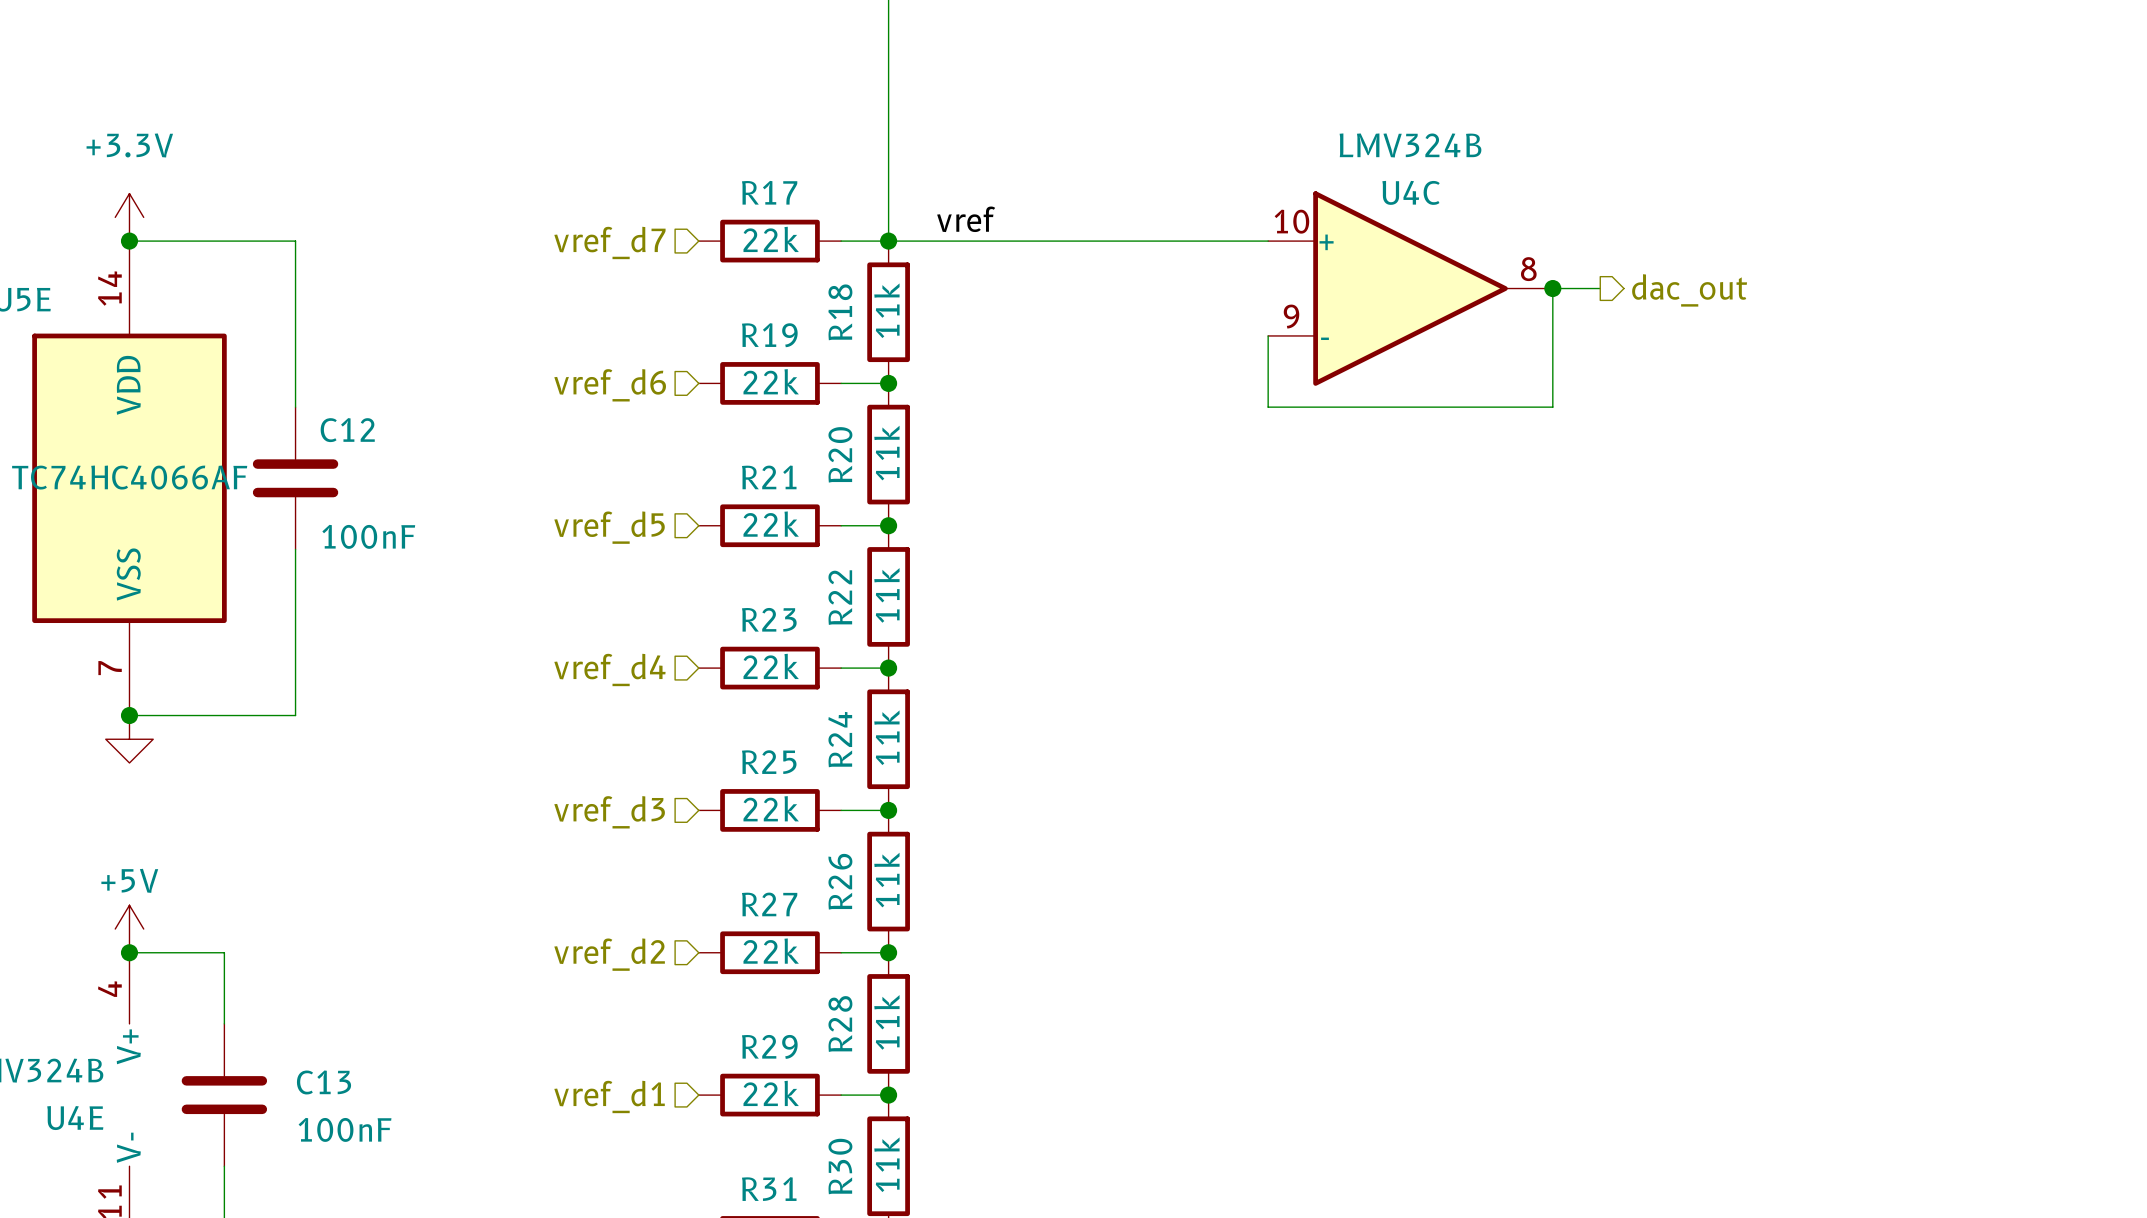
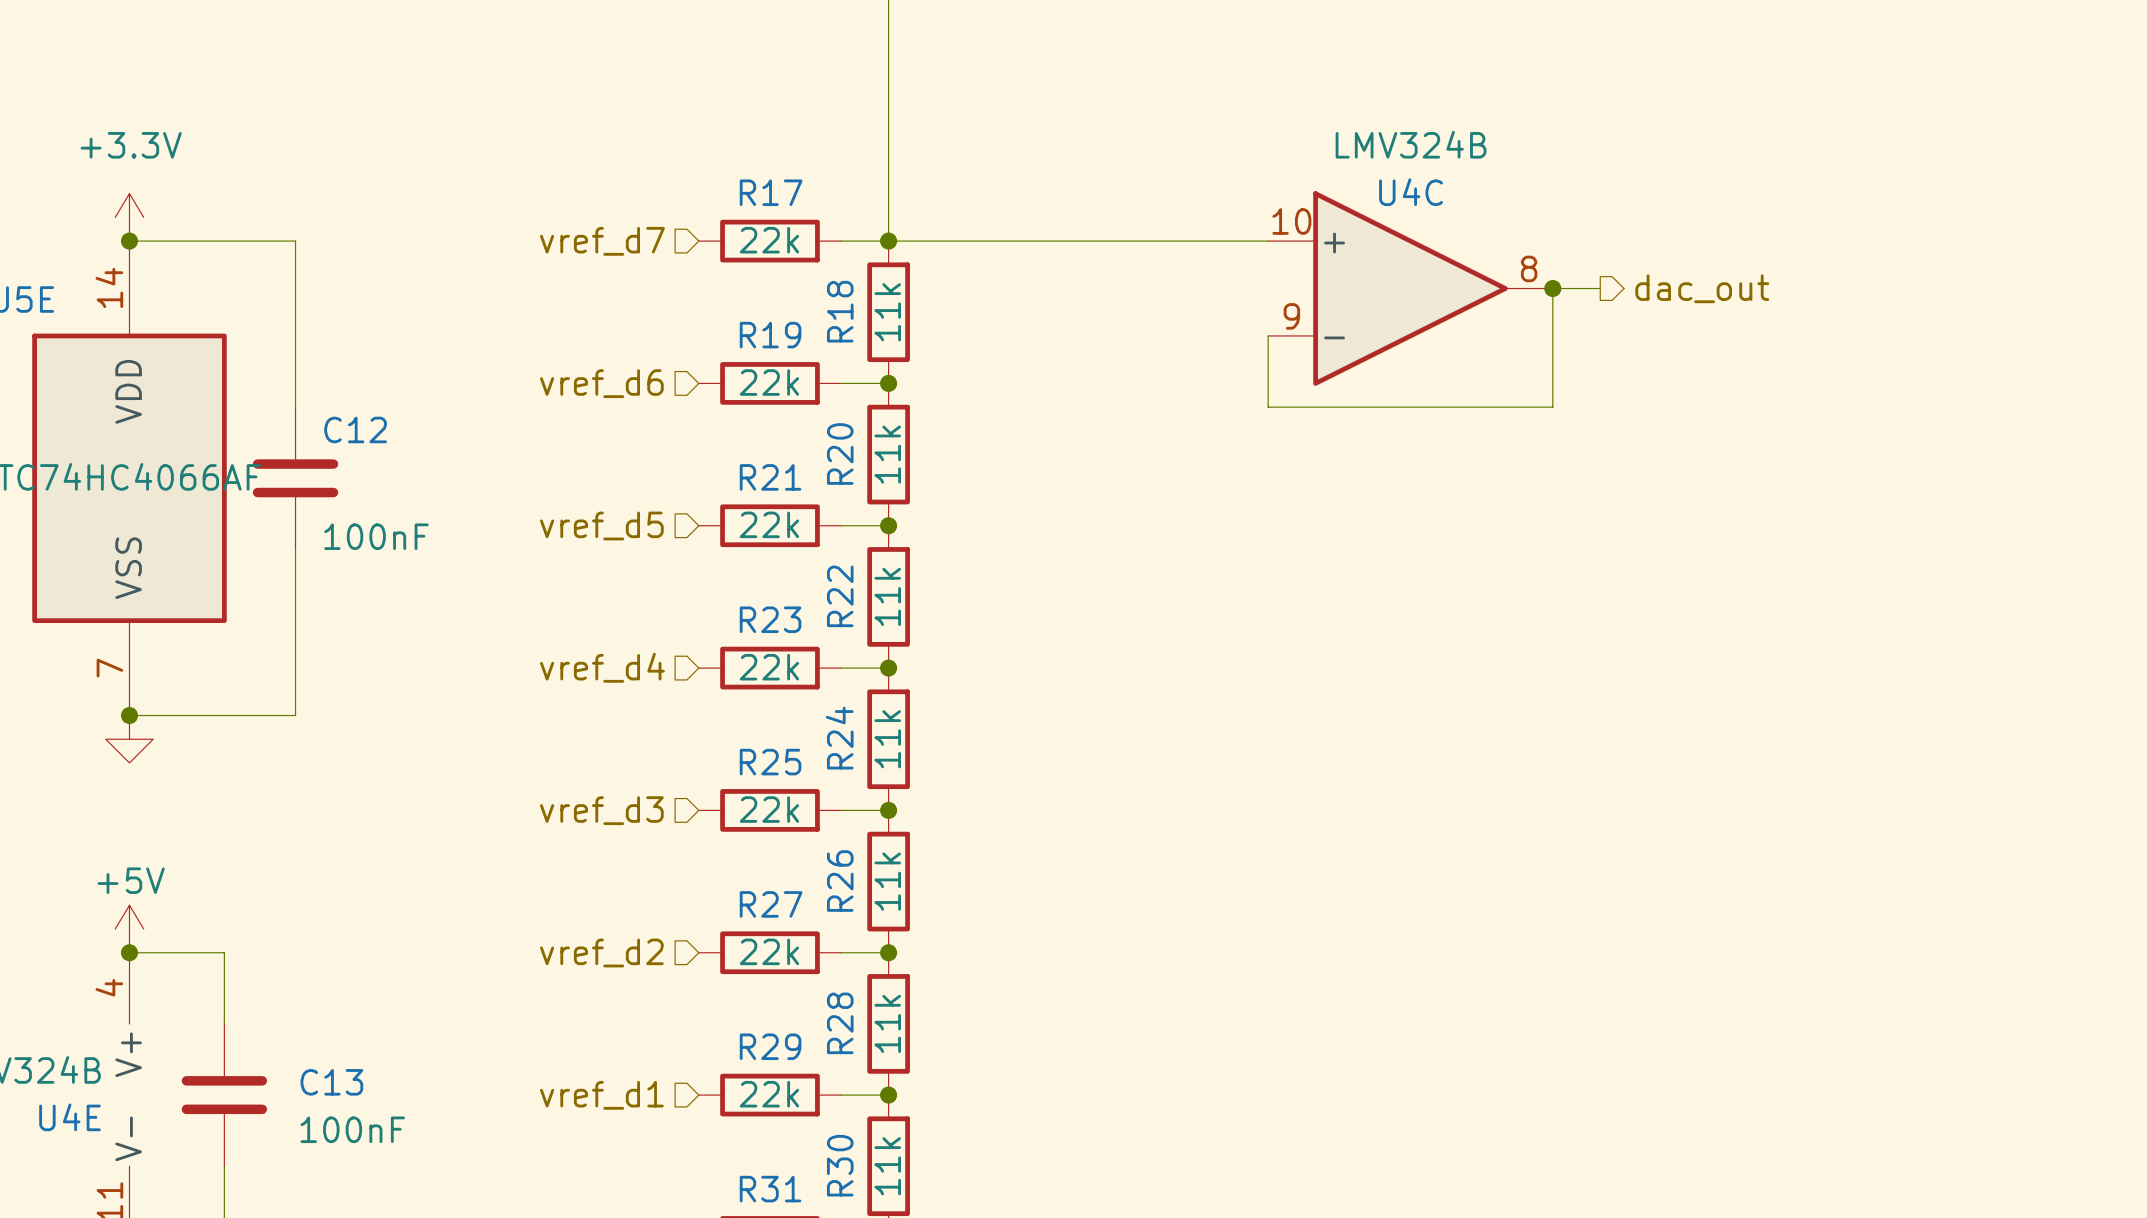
label: vref (966, 219) -> none

